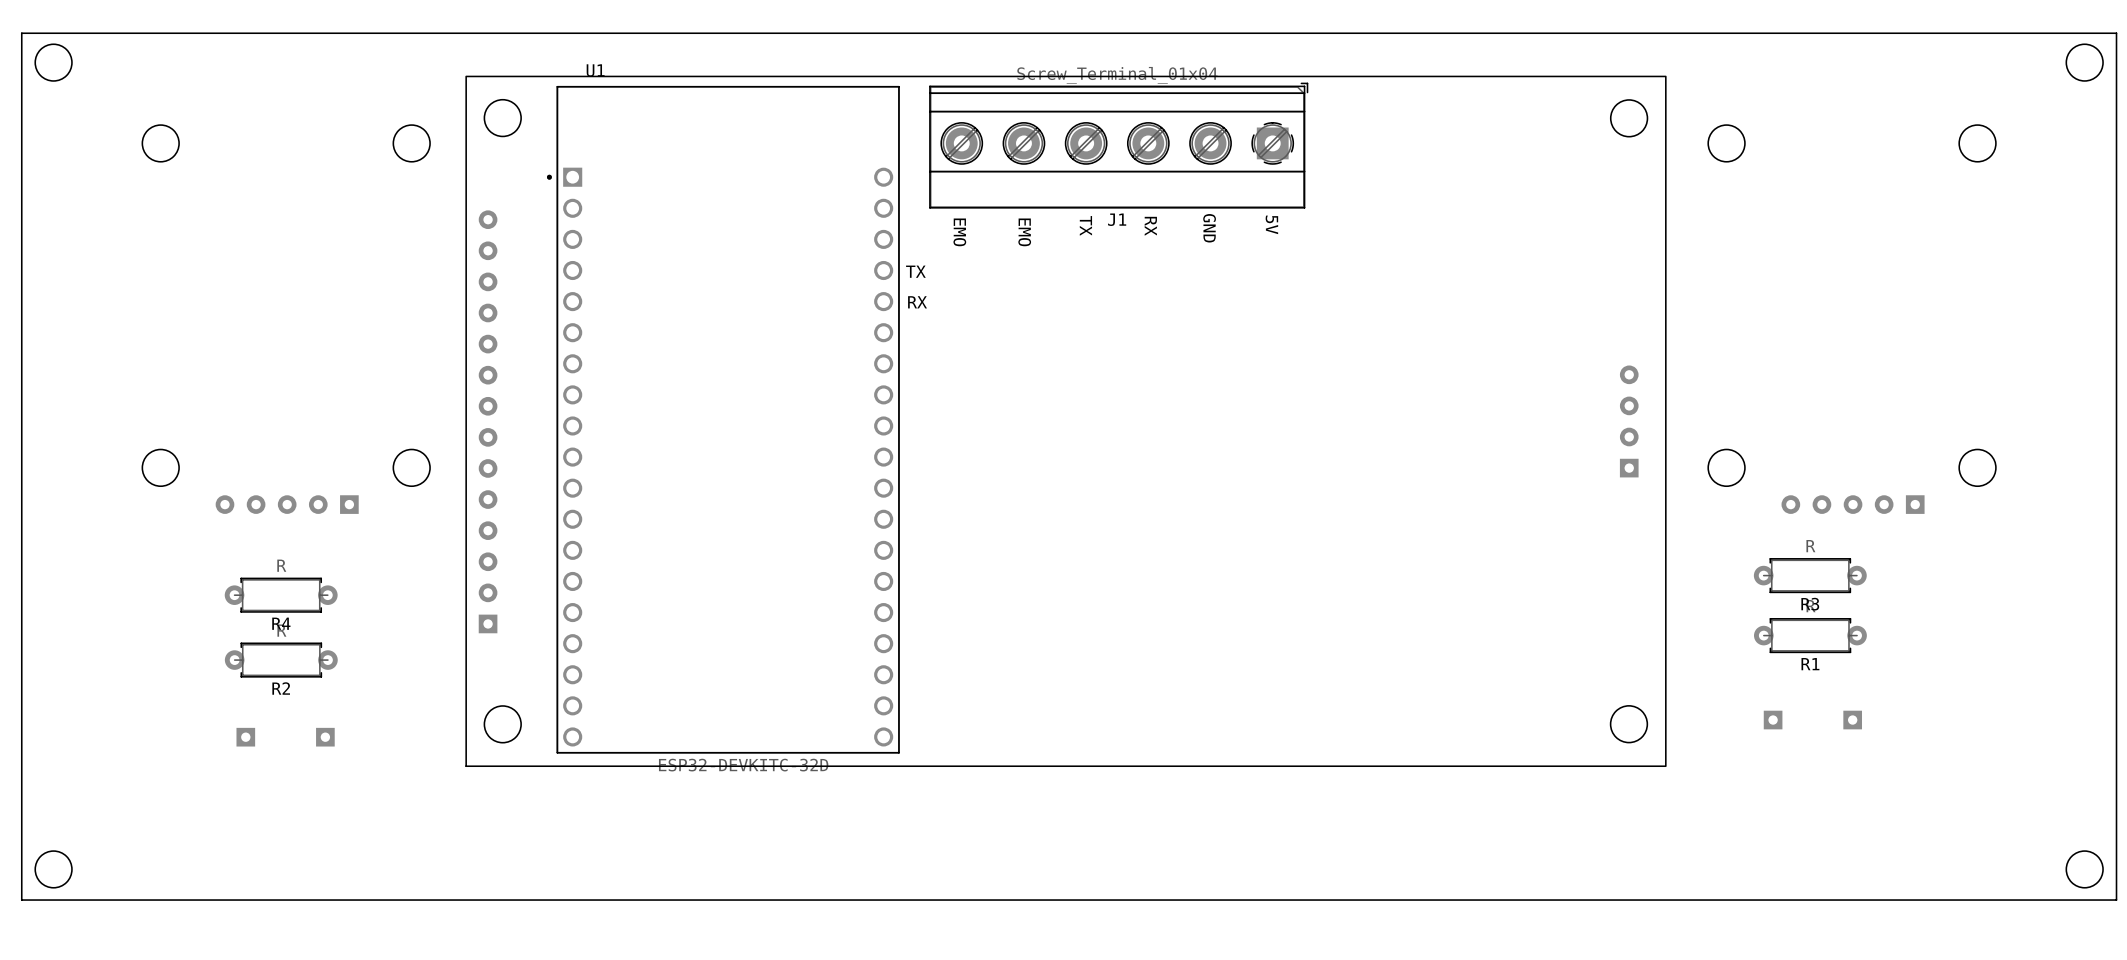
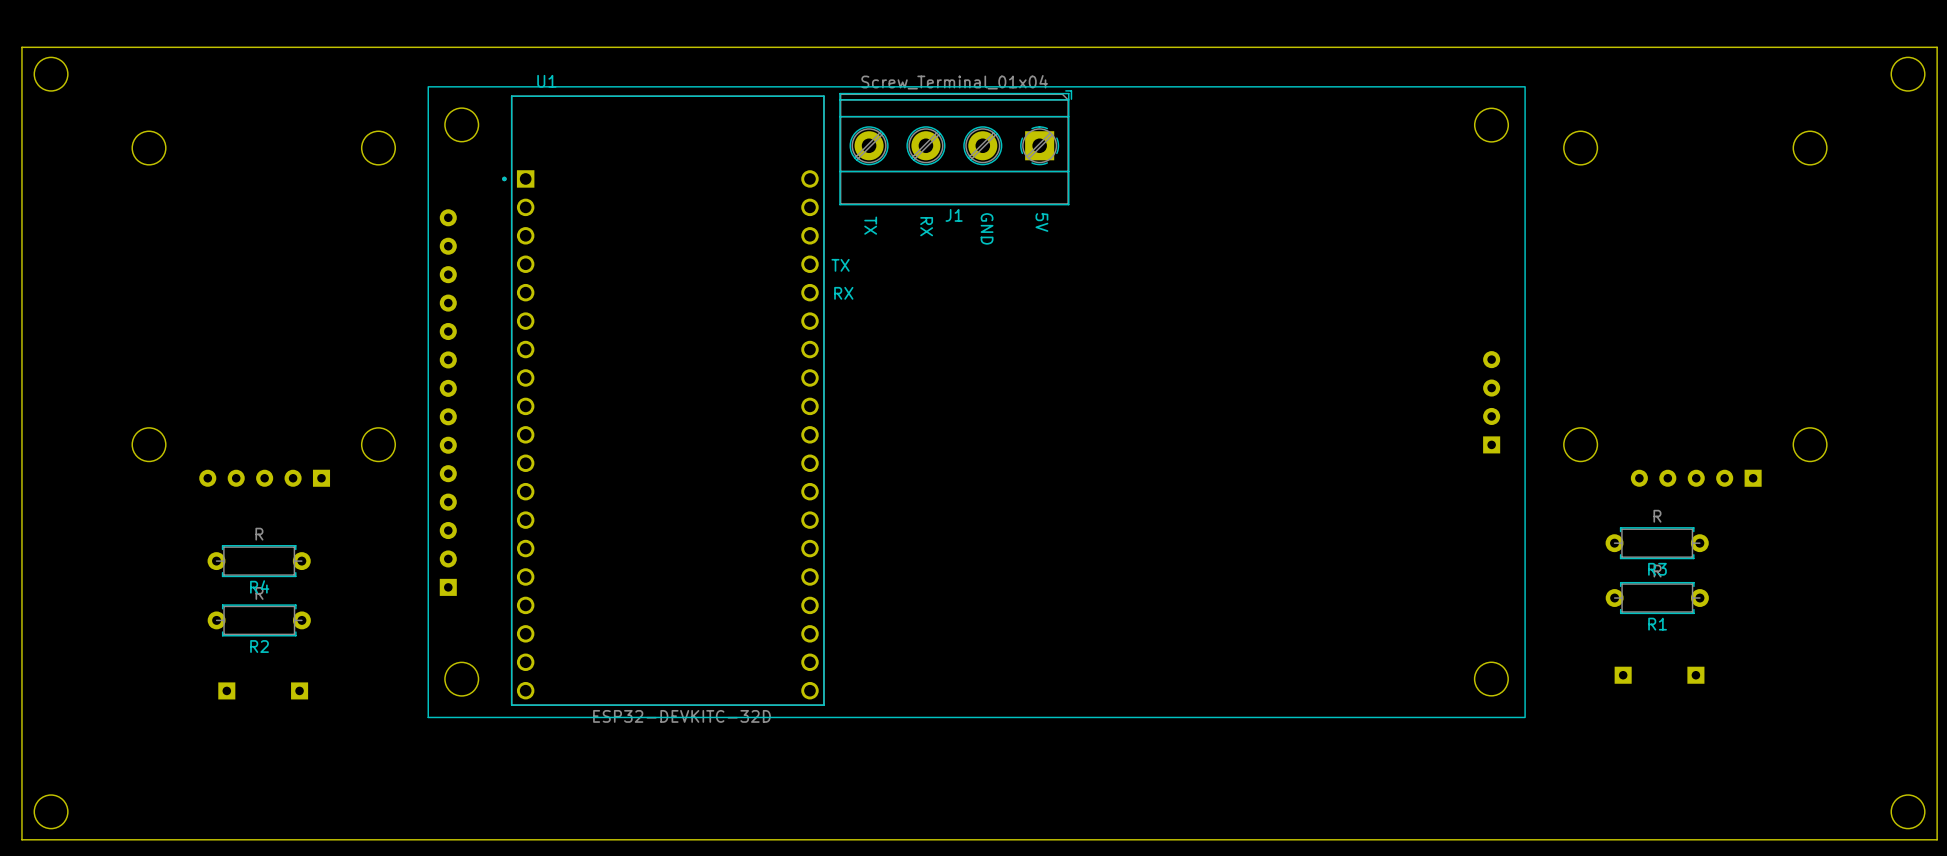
J1 footprint: [929, 82, 1309, 209] -> [839, 90, 1073, 206]
text position: 5V (1271, 224) -> 5V (1041, 222)
text: TX (1085, 225) -> GND (987, 228)
text position: RX (1150, 226) -> RX (926, 226)
text: GND (1209, 228) -> none
text: EMO (959, 232) -> TX (870, 225)
text: EMO (1024, 232) -> none

